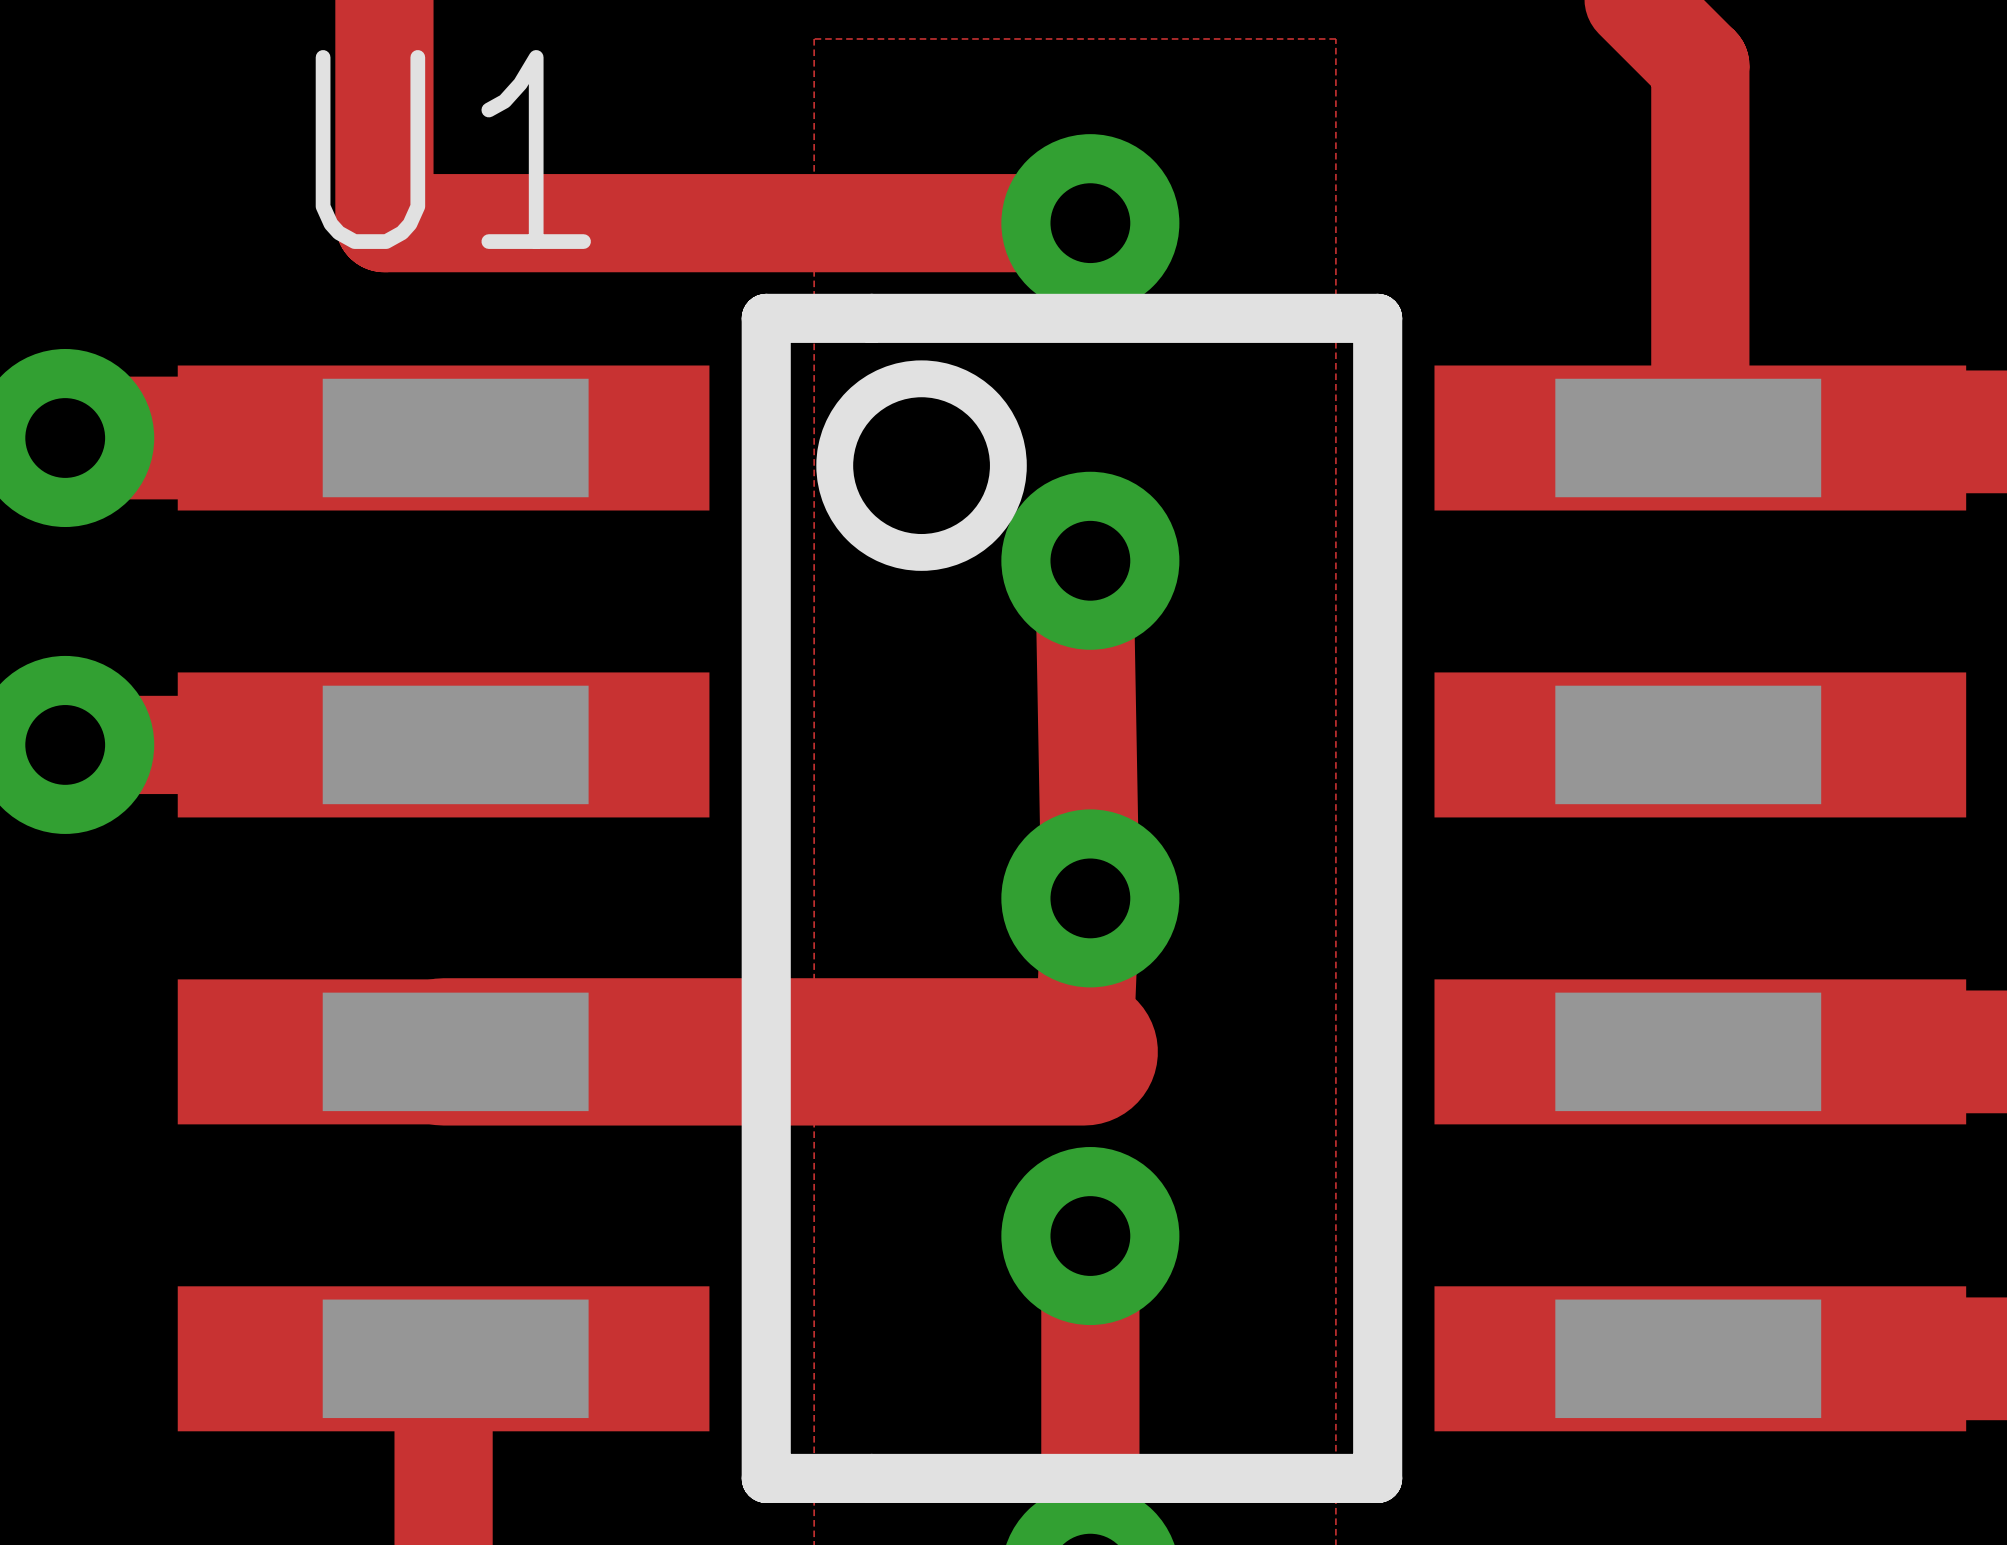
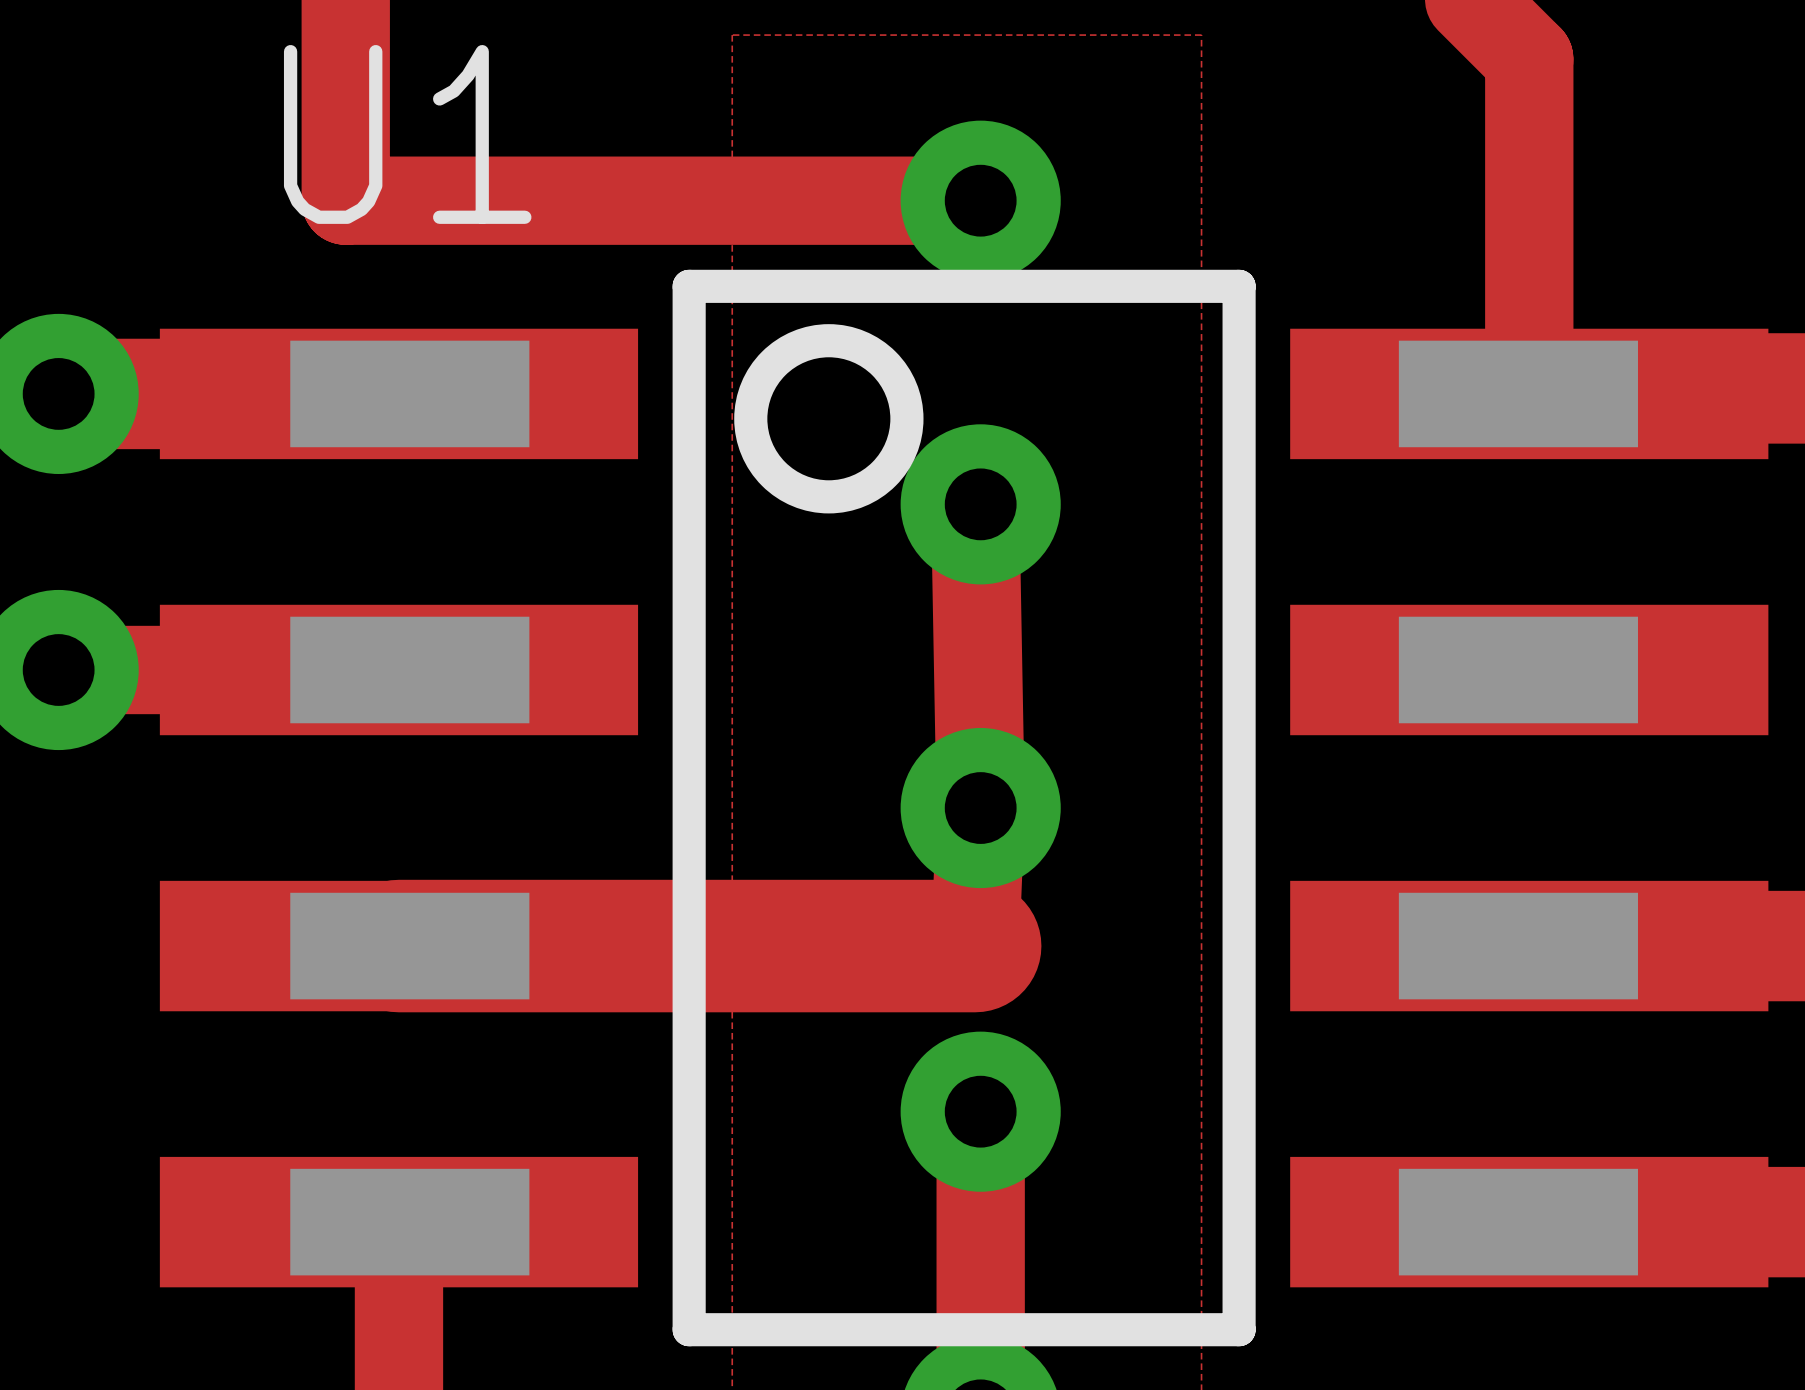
U1 footprint: [177, 293, 1967, 1503] -> [159, 269, 1769, 1347]

